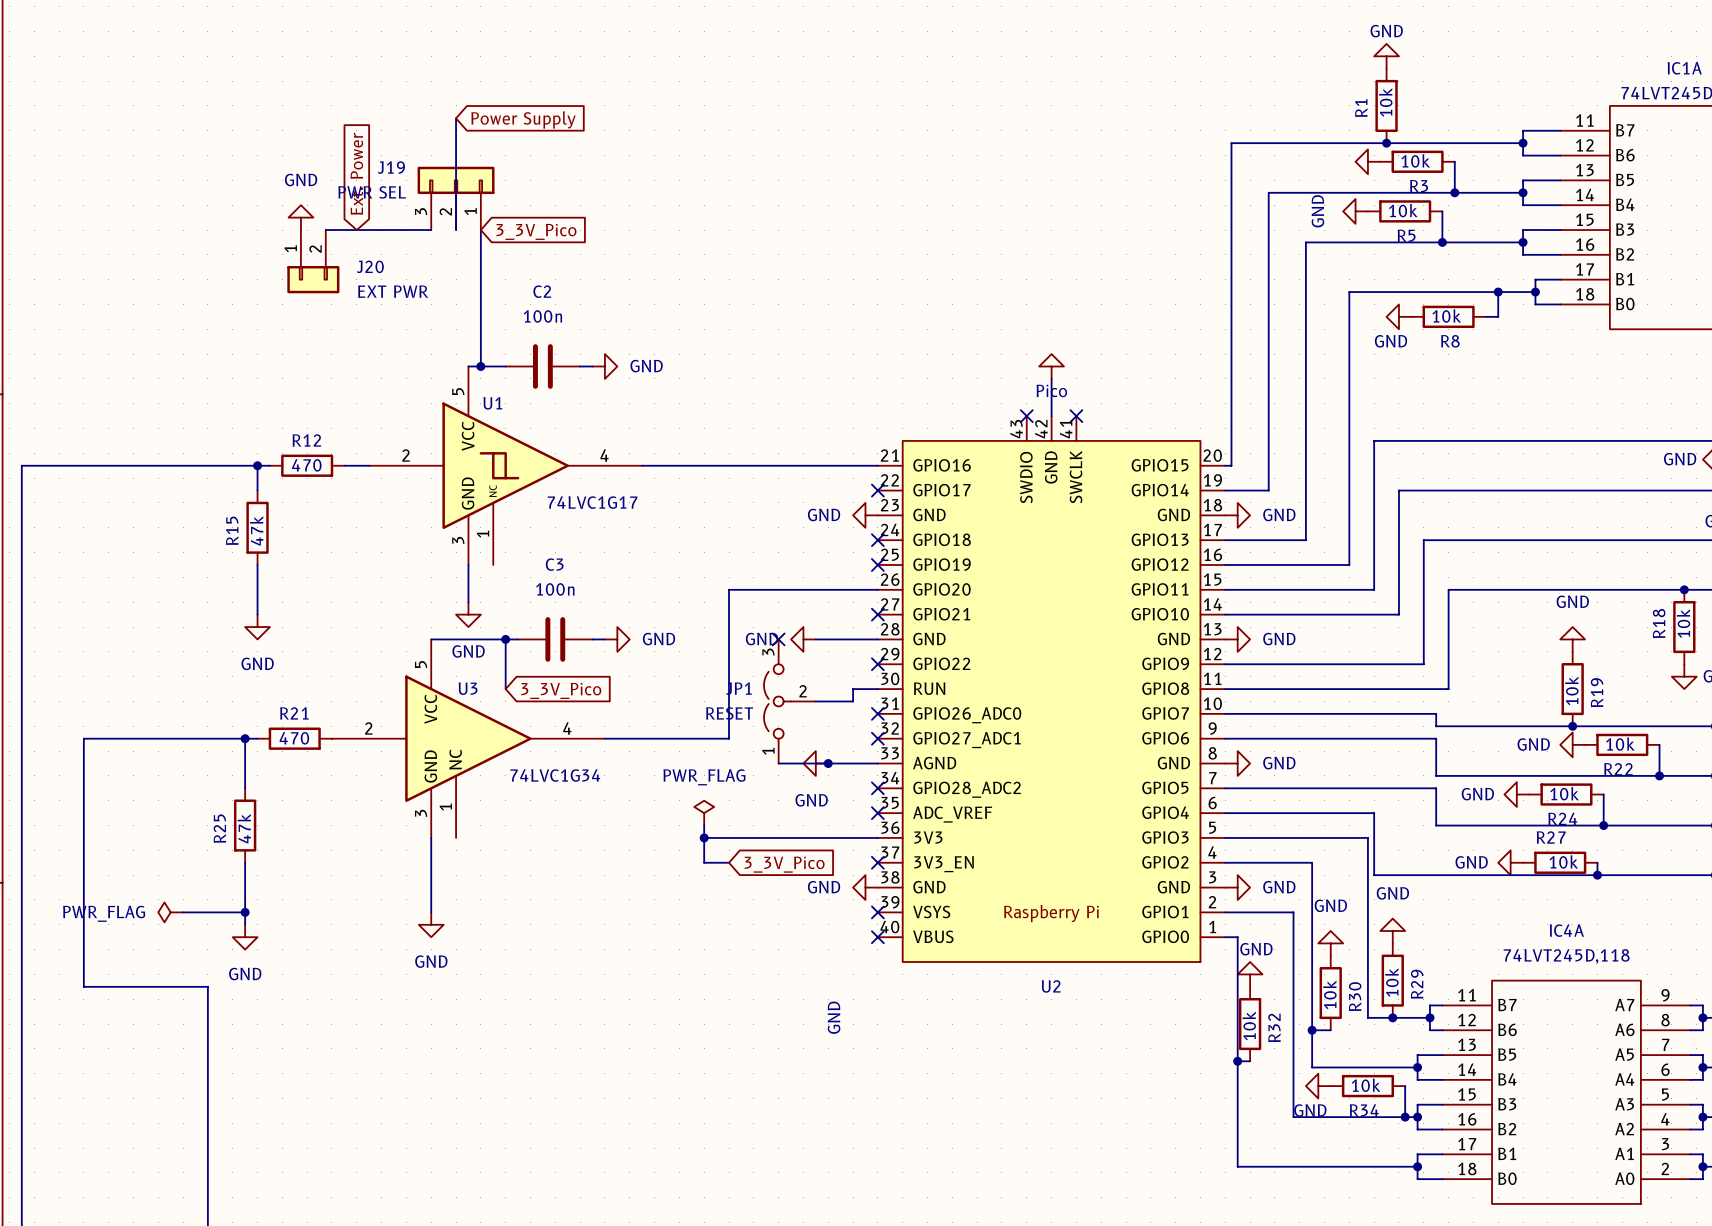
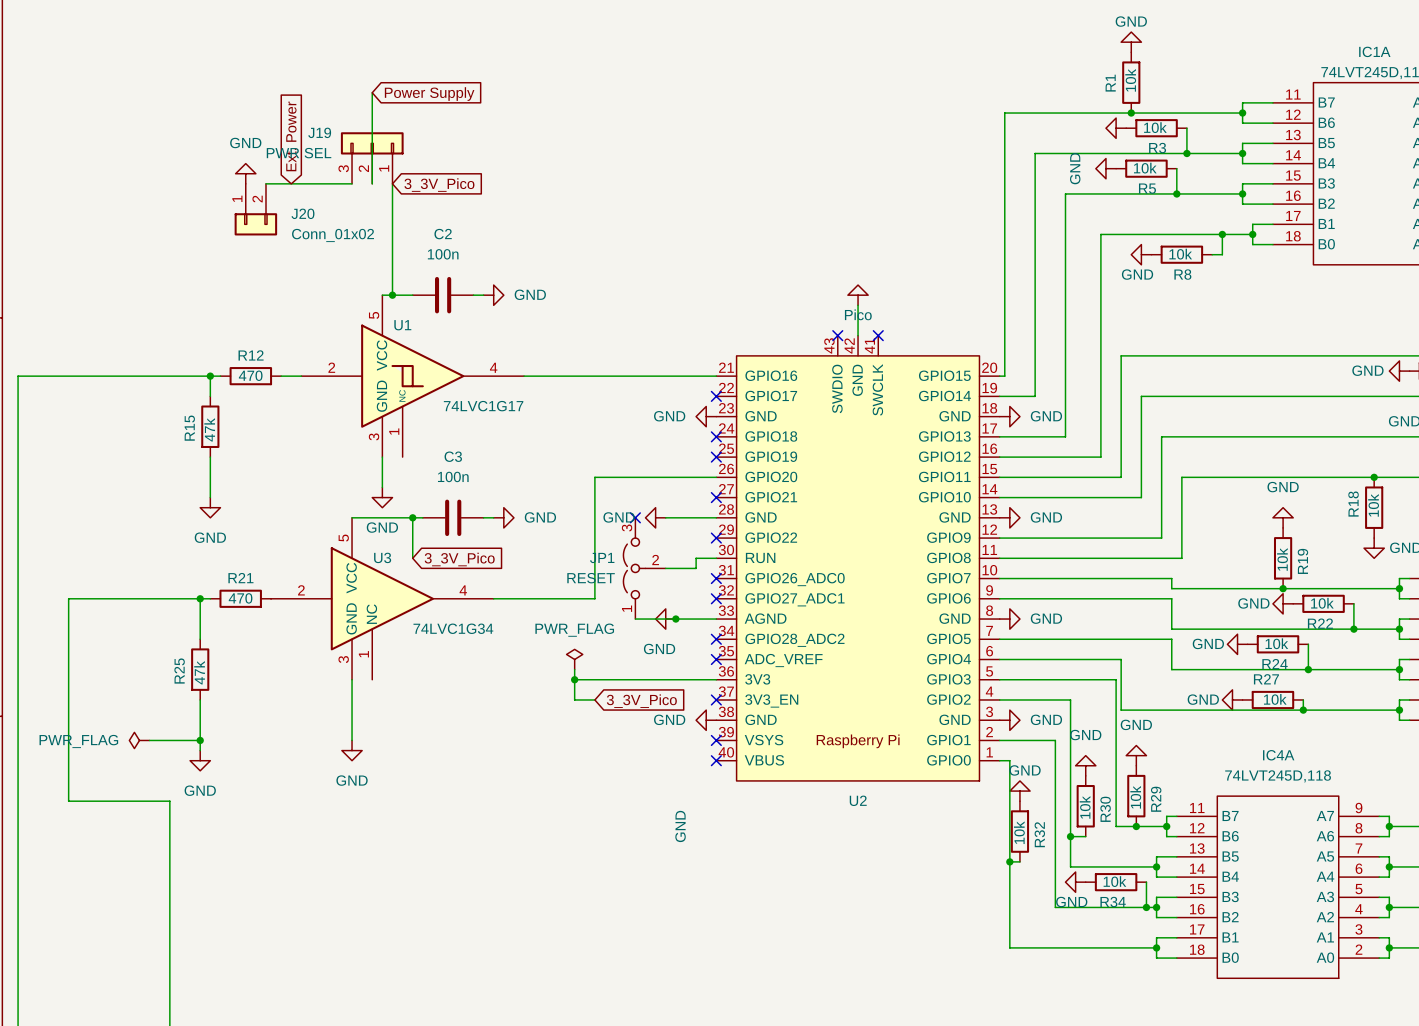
J20 value: EXT PWR (393, 291) -> Conn_01x02 (333, 235)

